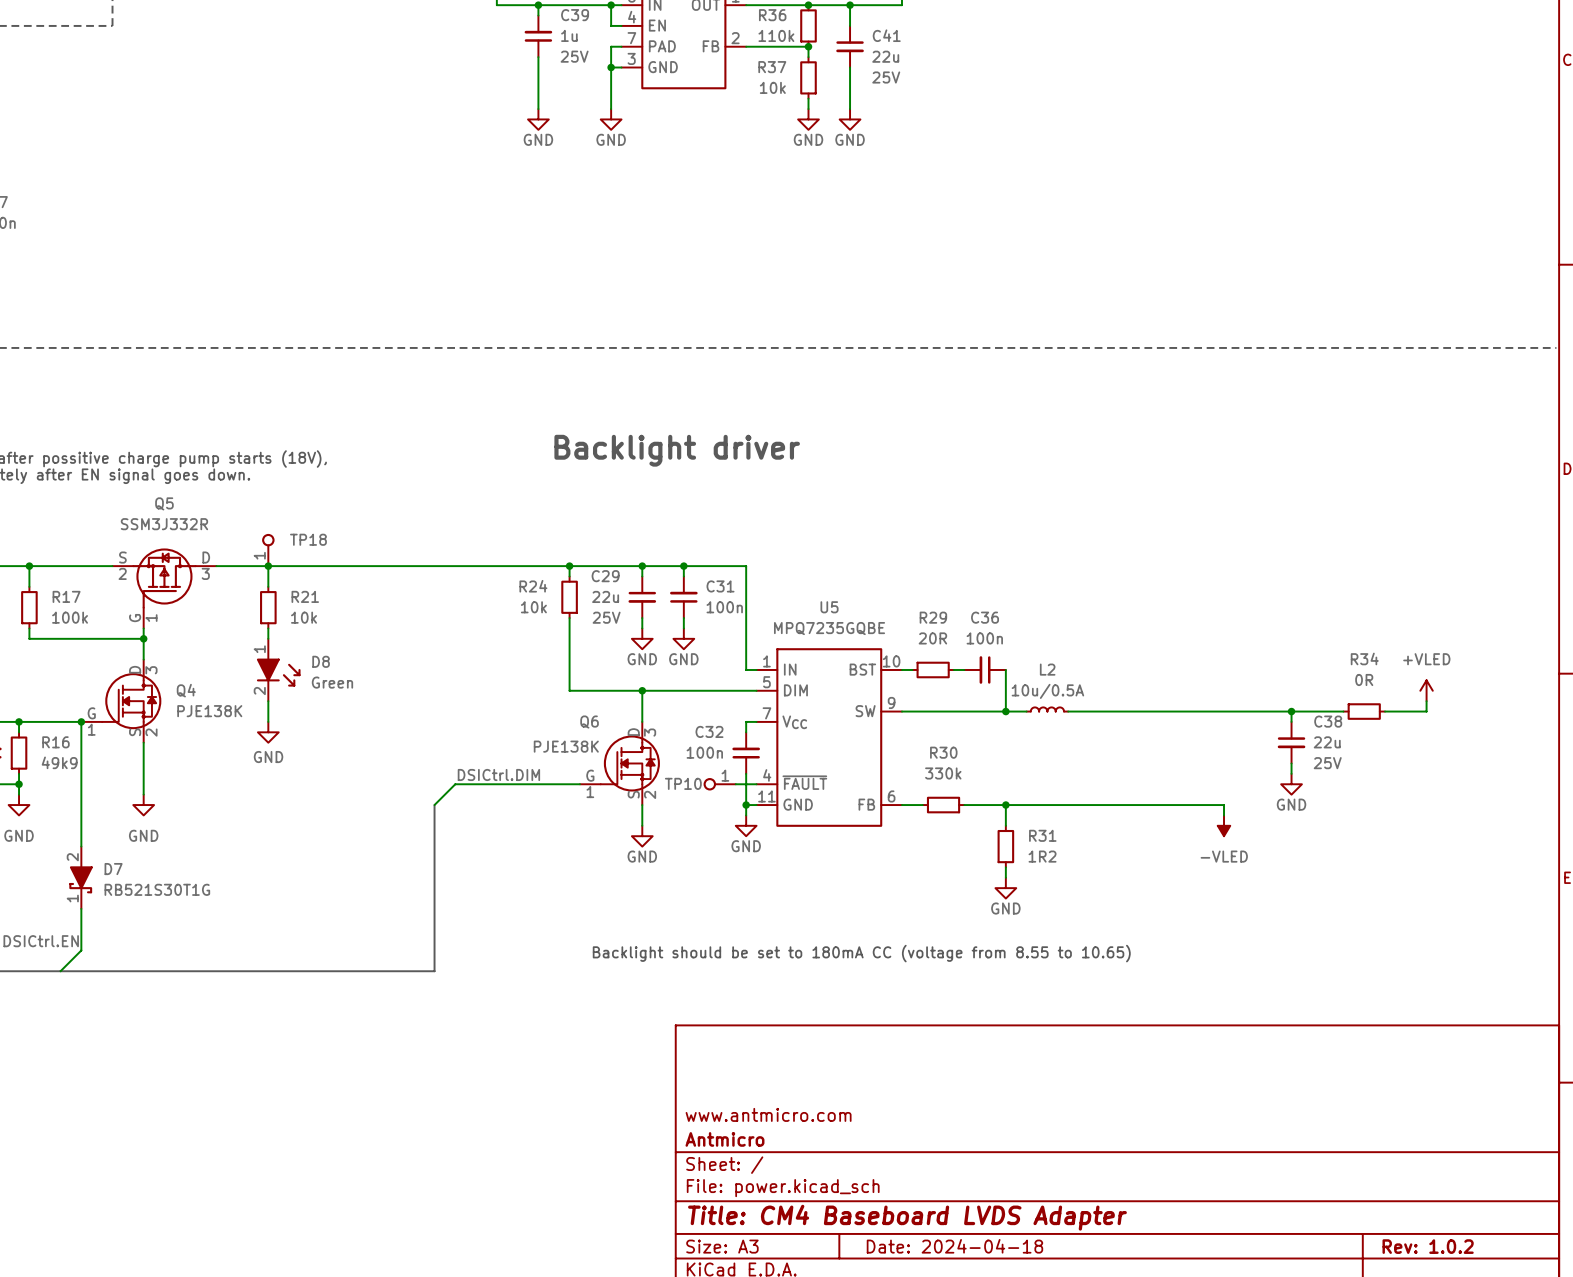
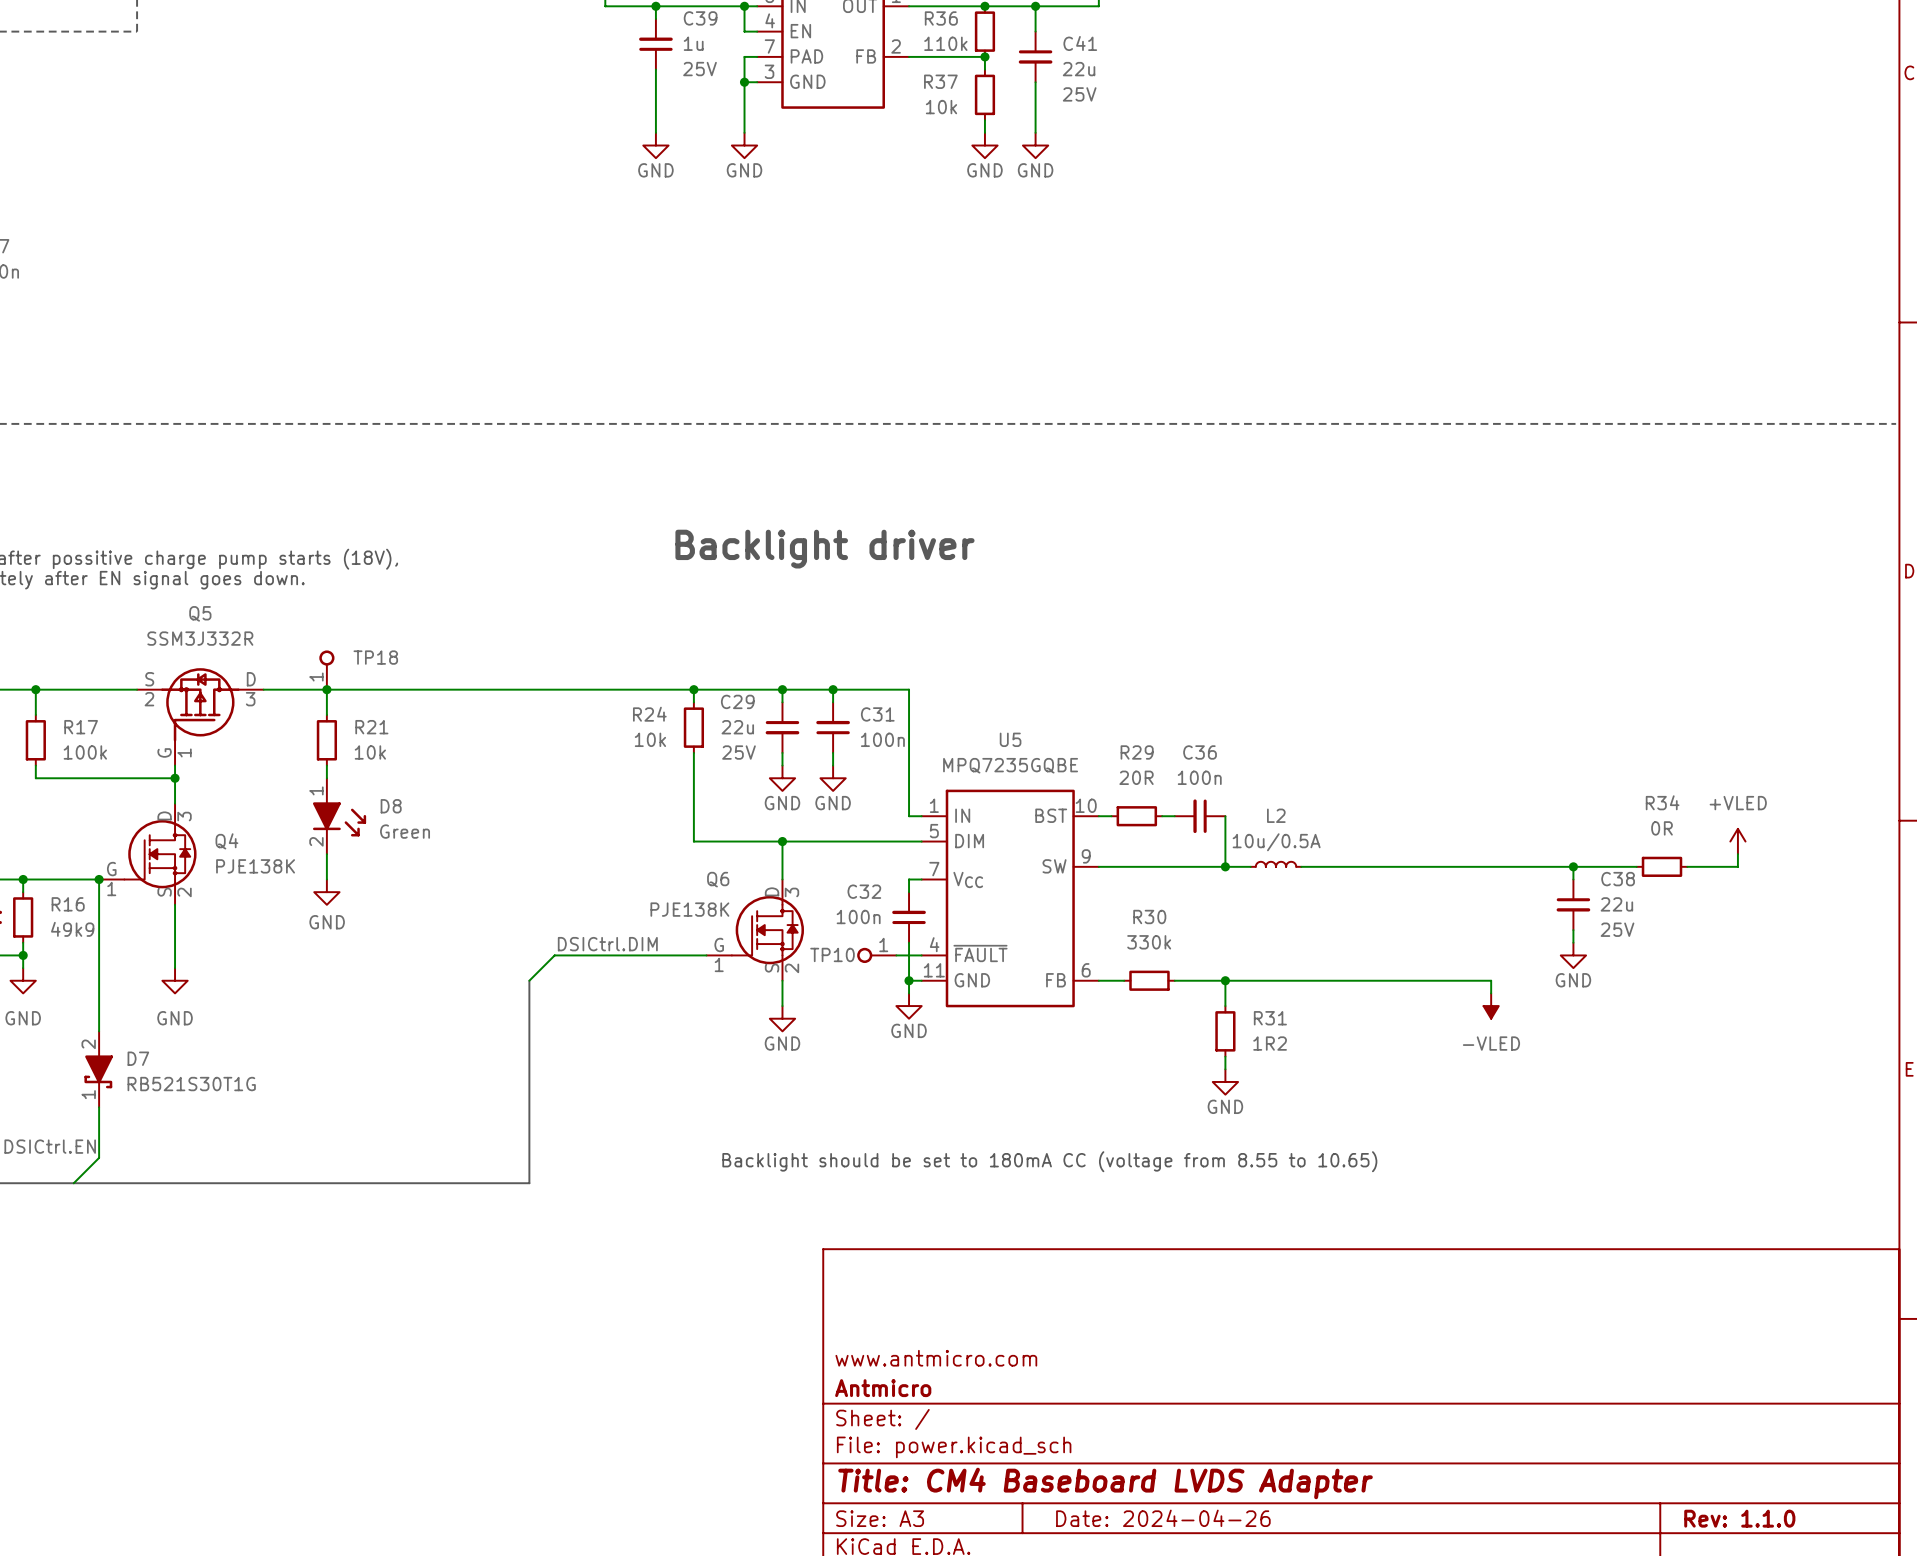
title block: Date: 2024-04-18 (954, 1246) -> Date: 2024-04-26 (1163, 1518)
title block: Rev: 1.0.2 (1428, 1246) -> Rev: 1.1.0 (1739, 1518)

